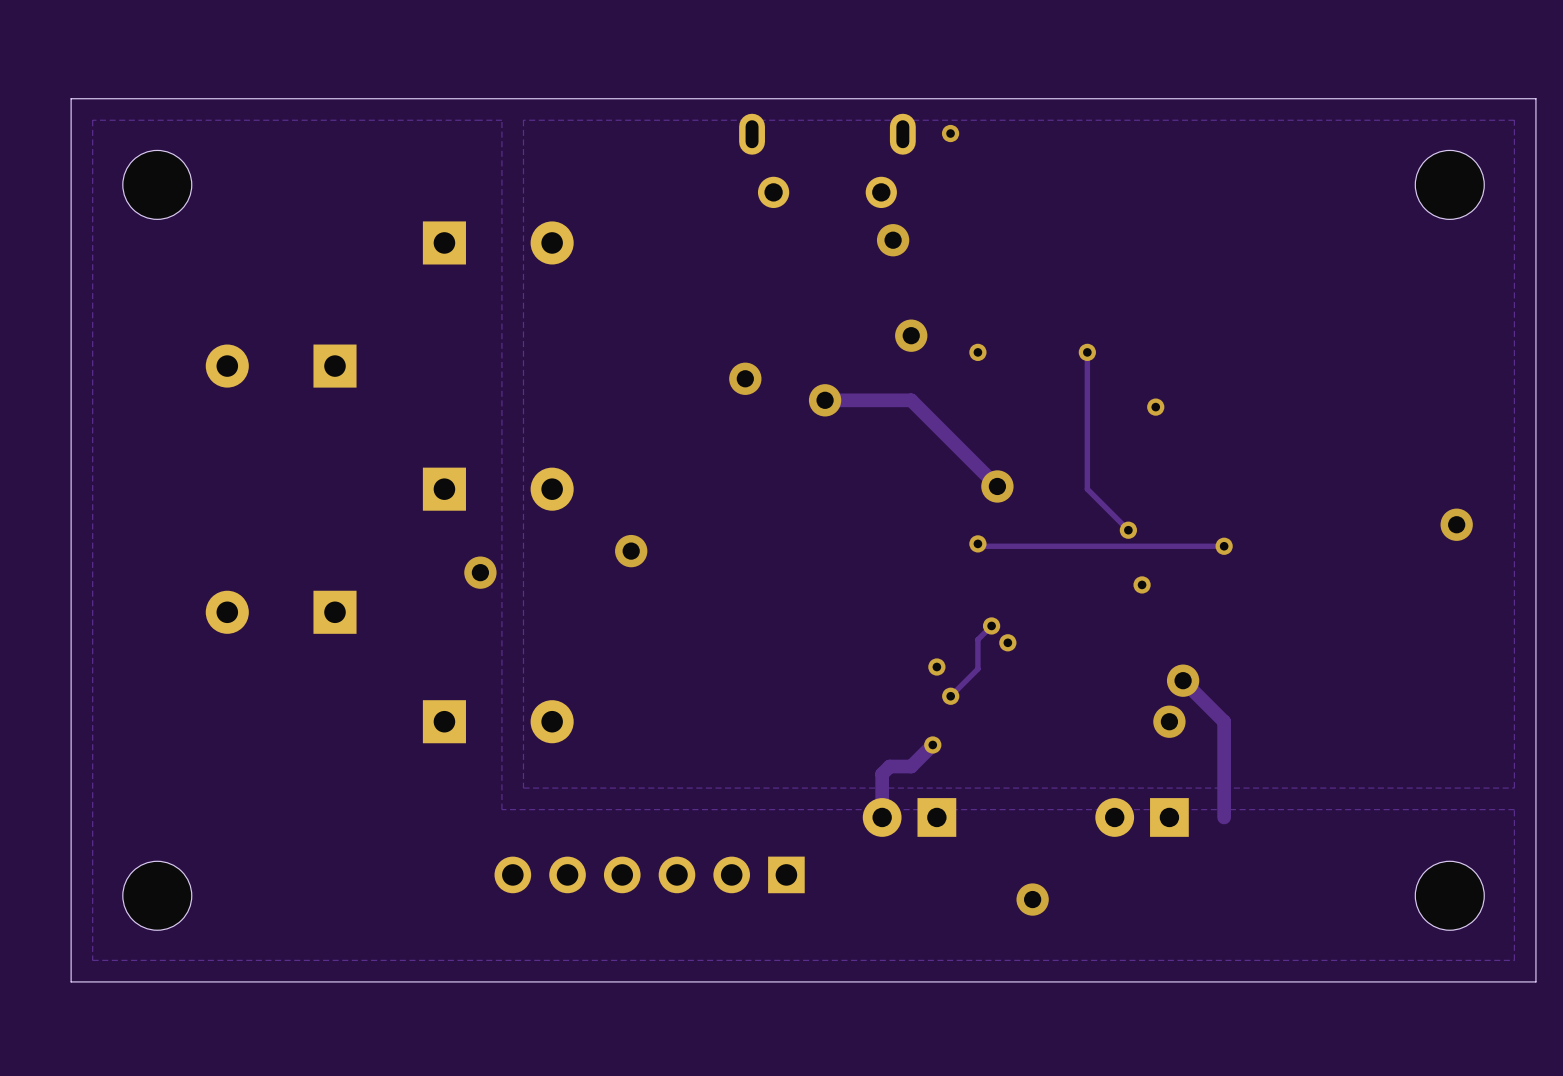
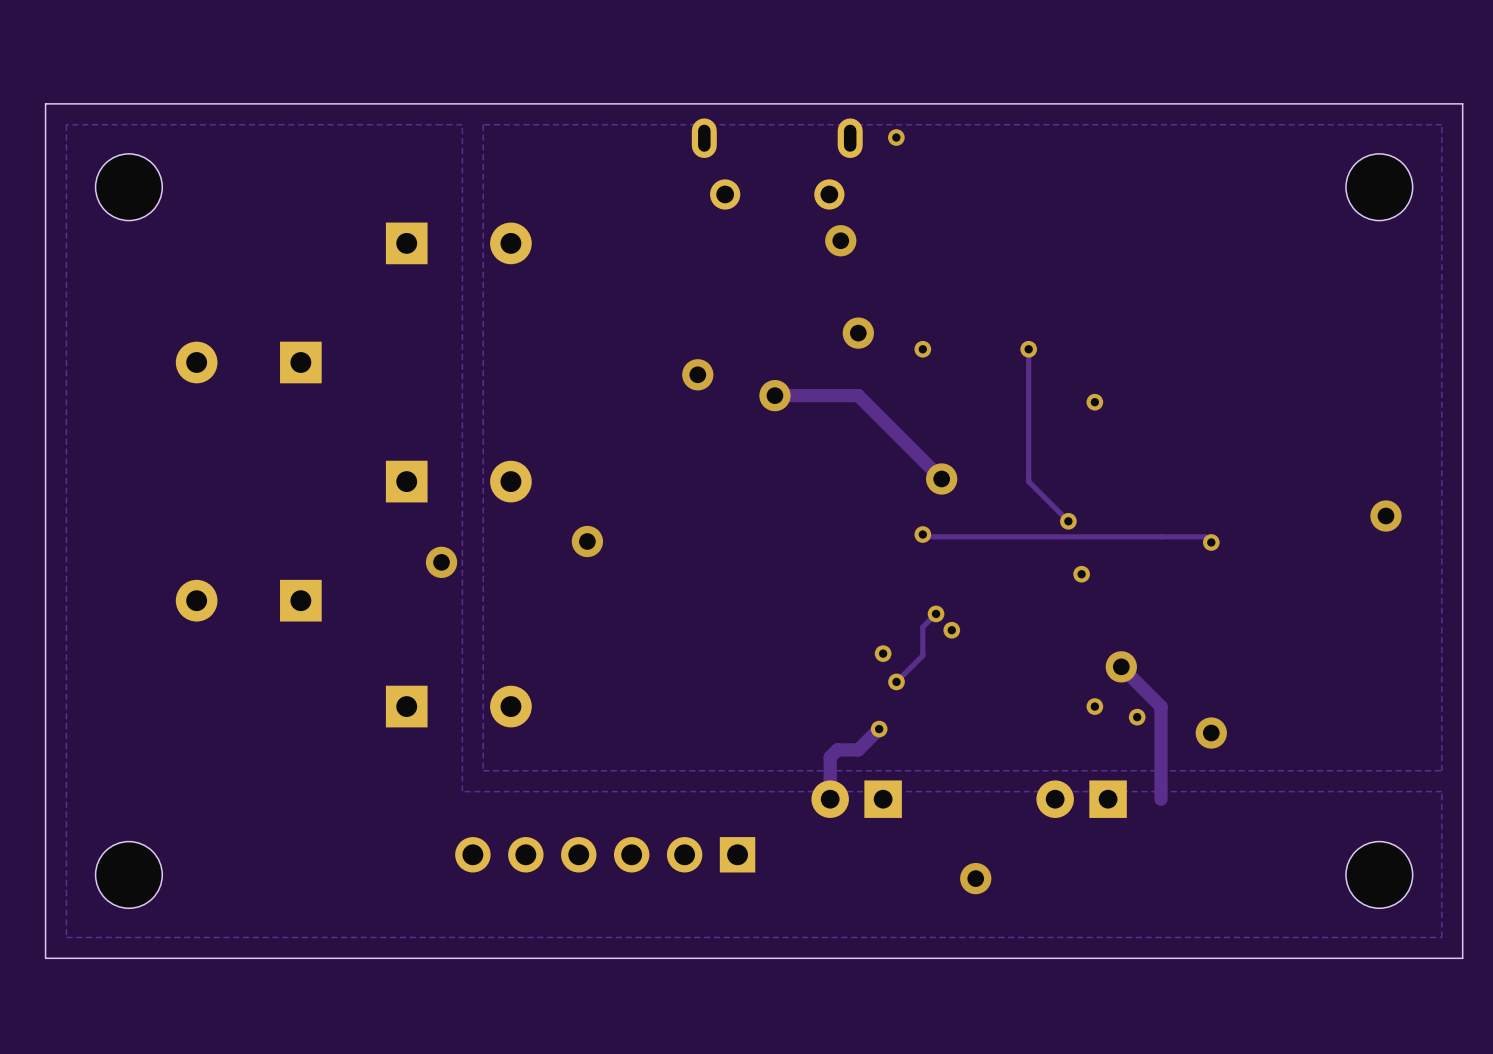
track: none -> (1161, 536) (1205, 536) (1211, 542)
via position: (1224, 546) -> (1211, 542)
via: none -> (1094, 706)
via position: (1169, 721) -> (1211, 733)
via: none -> (1137, 717)

